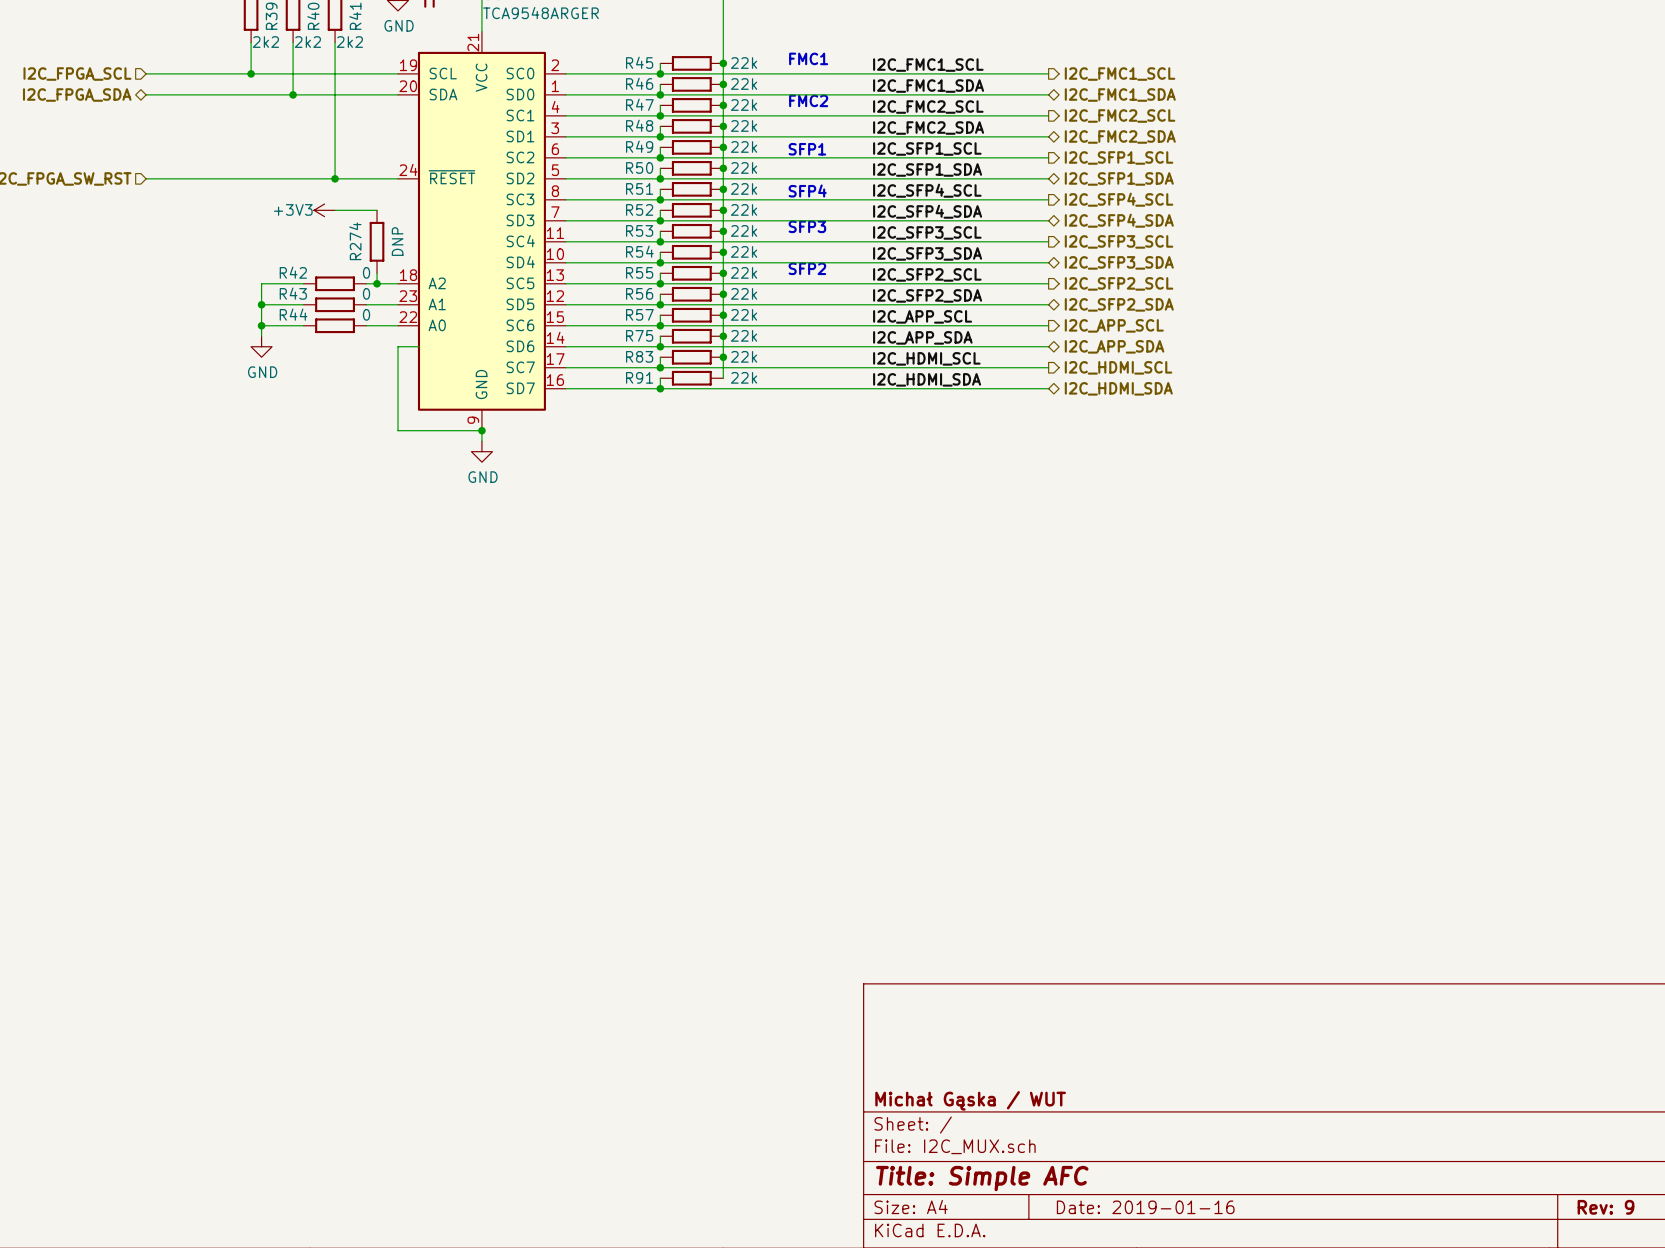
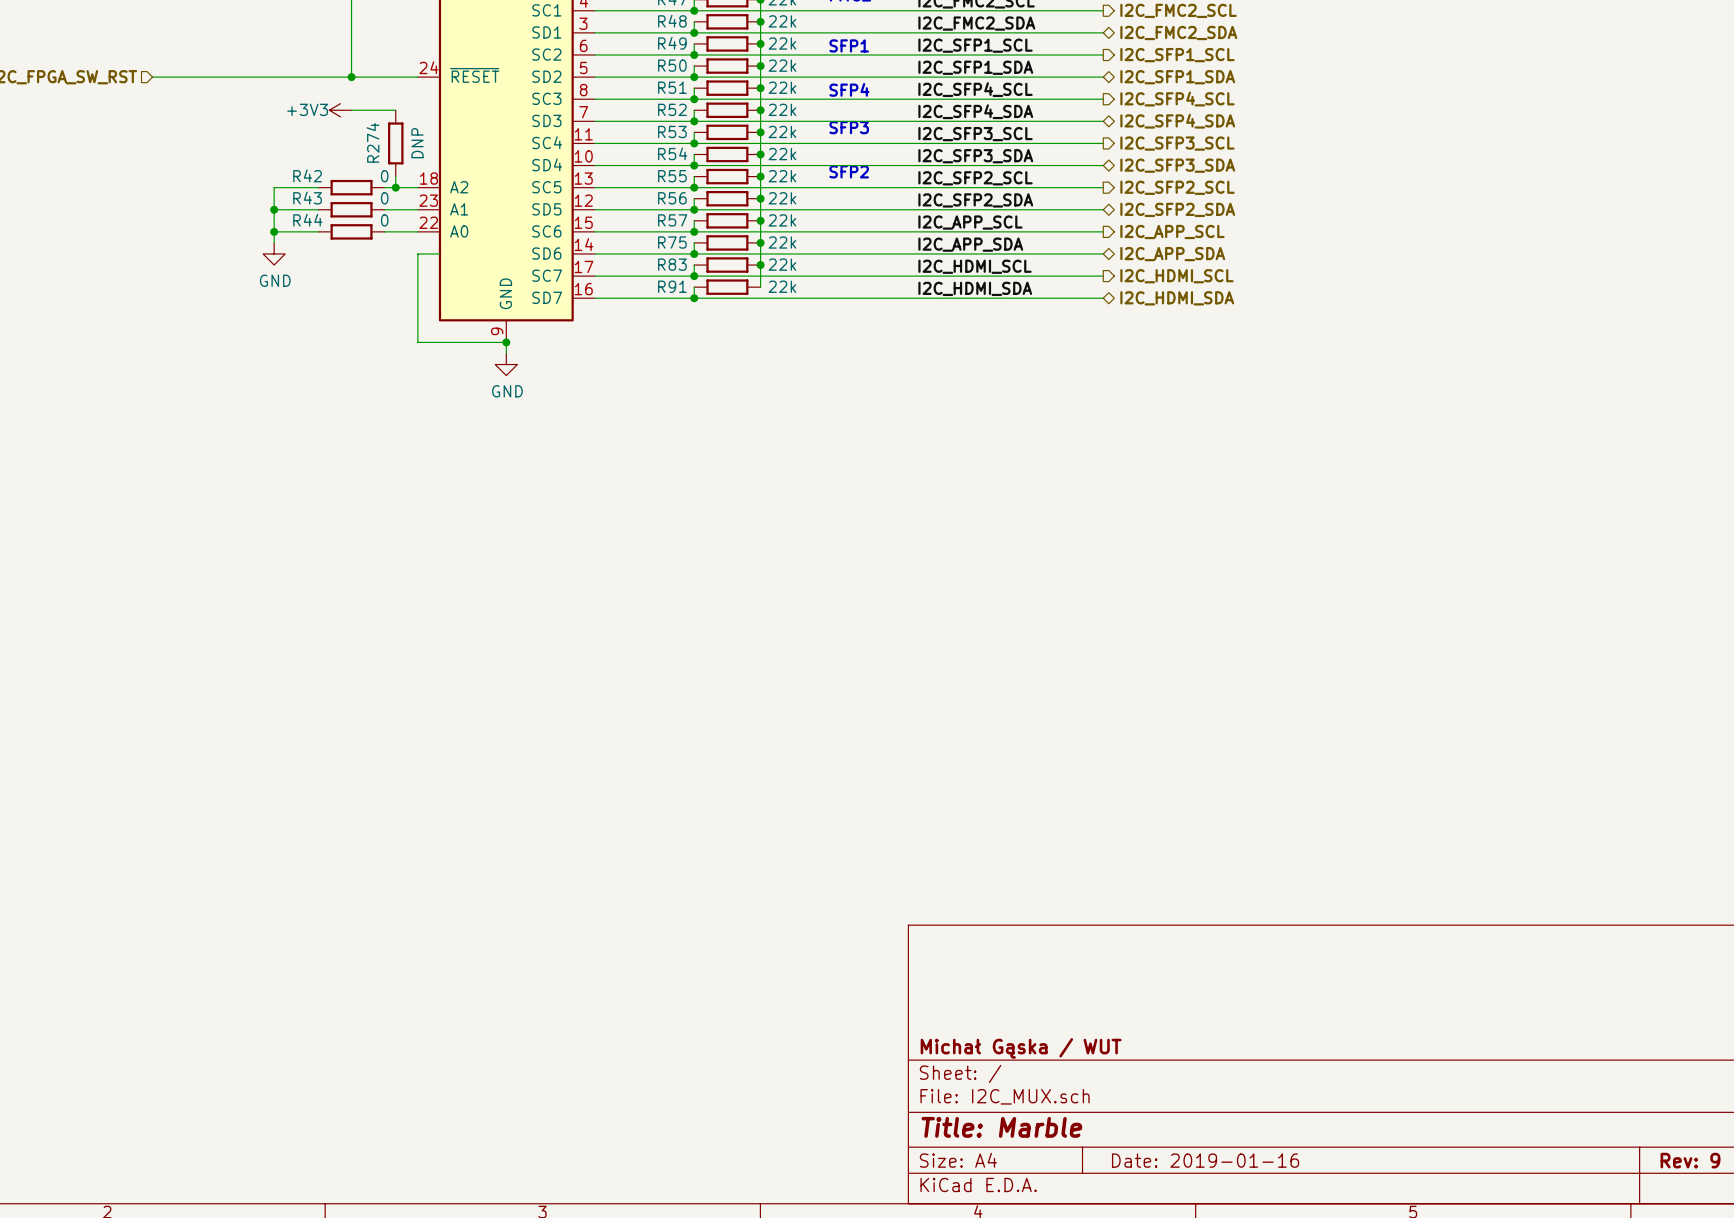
title block: Title: Simple AFC (982, 1178) -> Title: Marble (1001, 1127)

